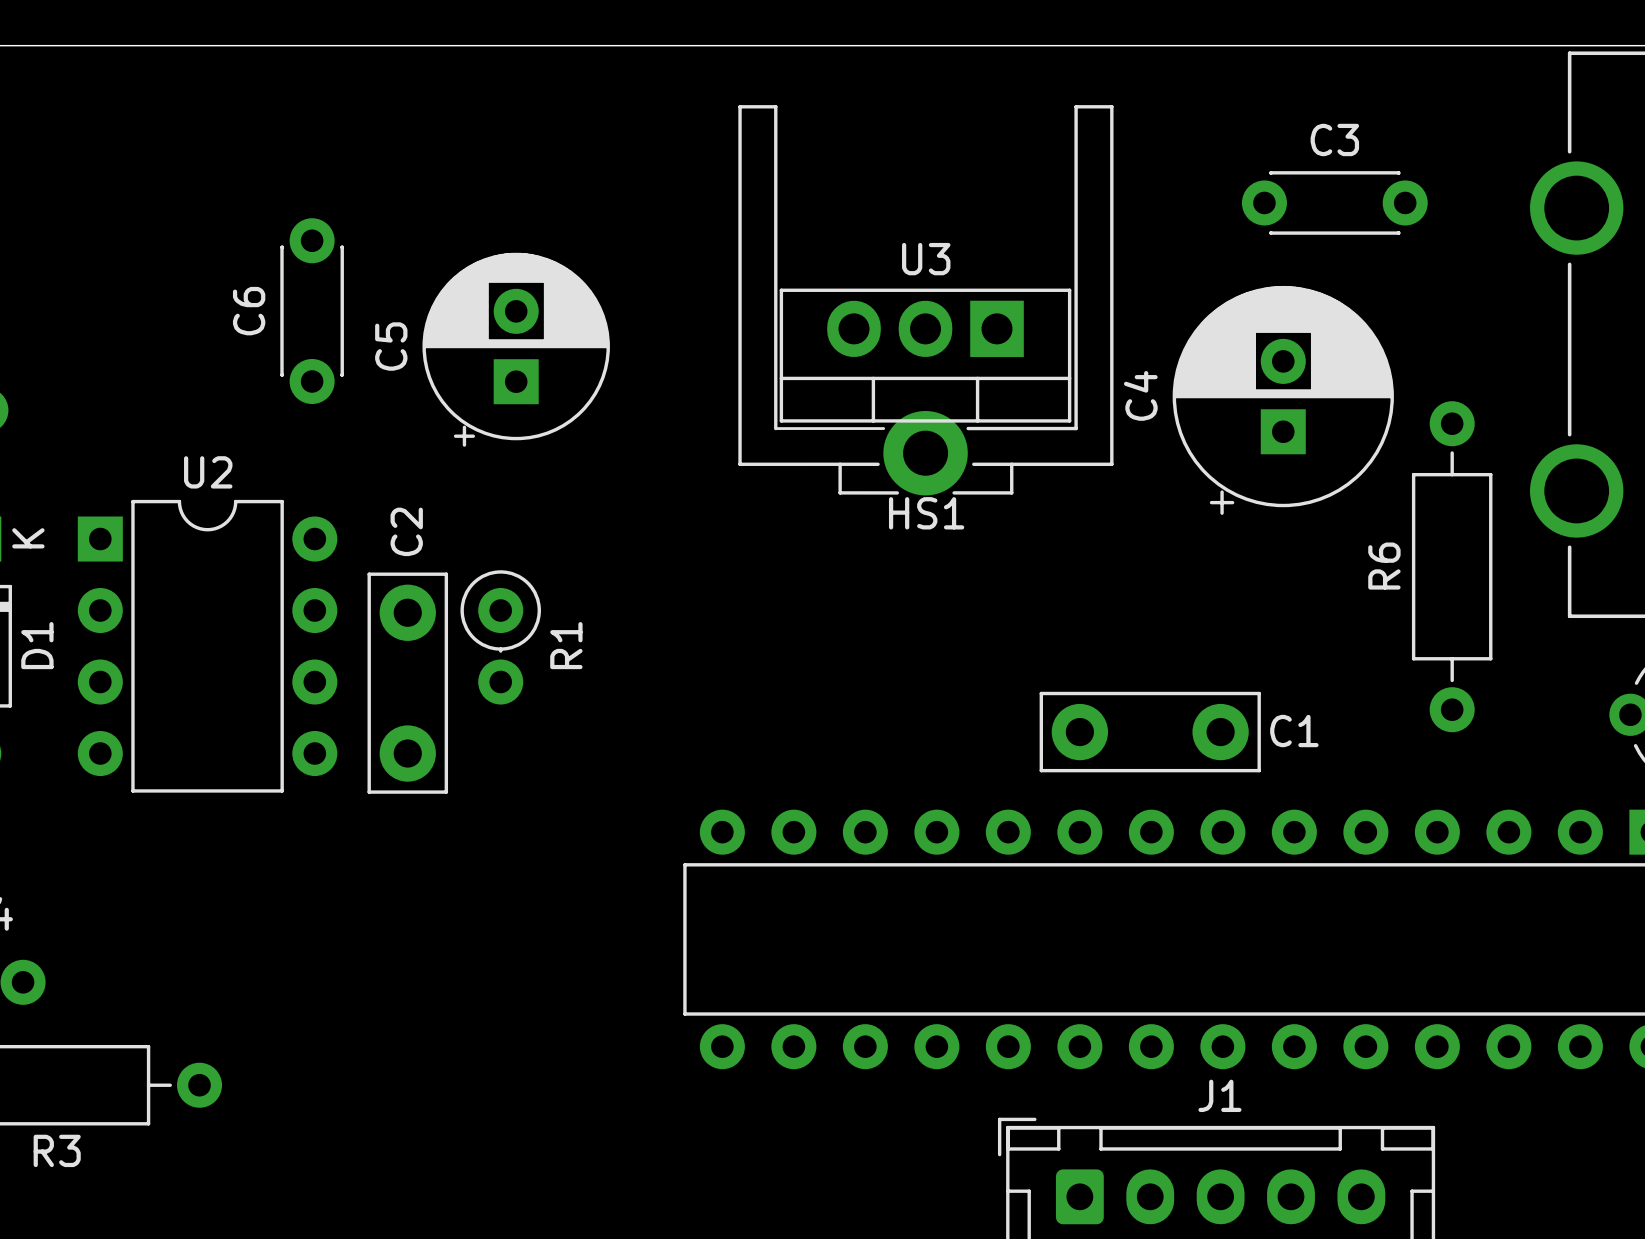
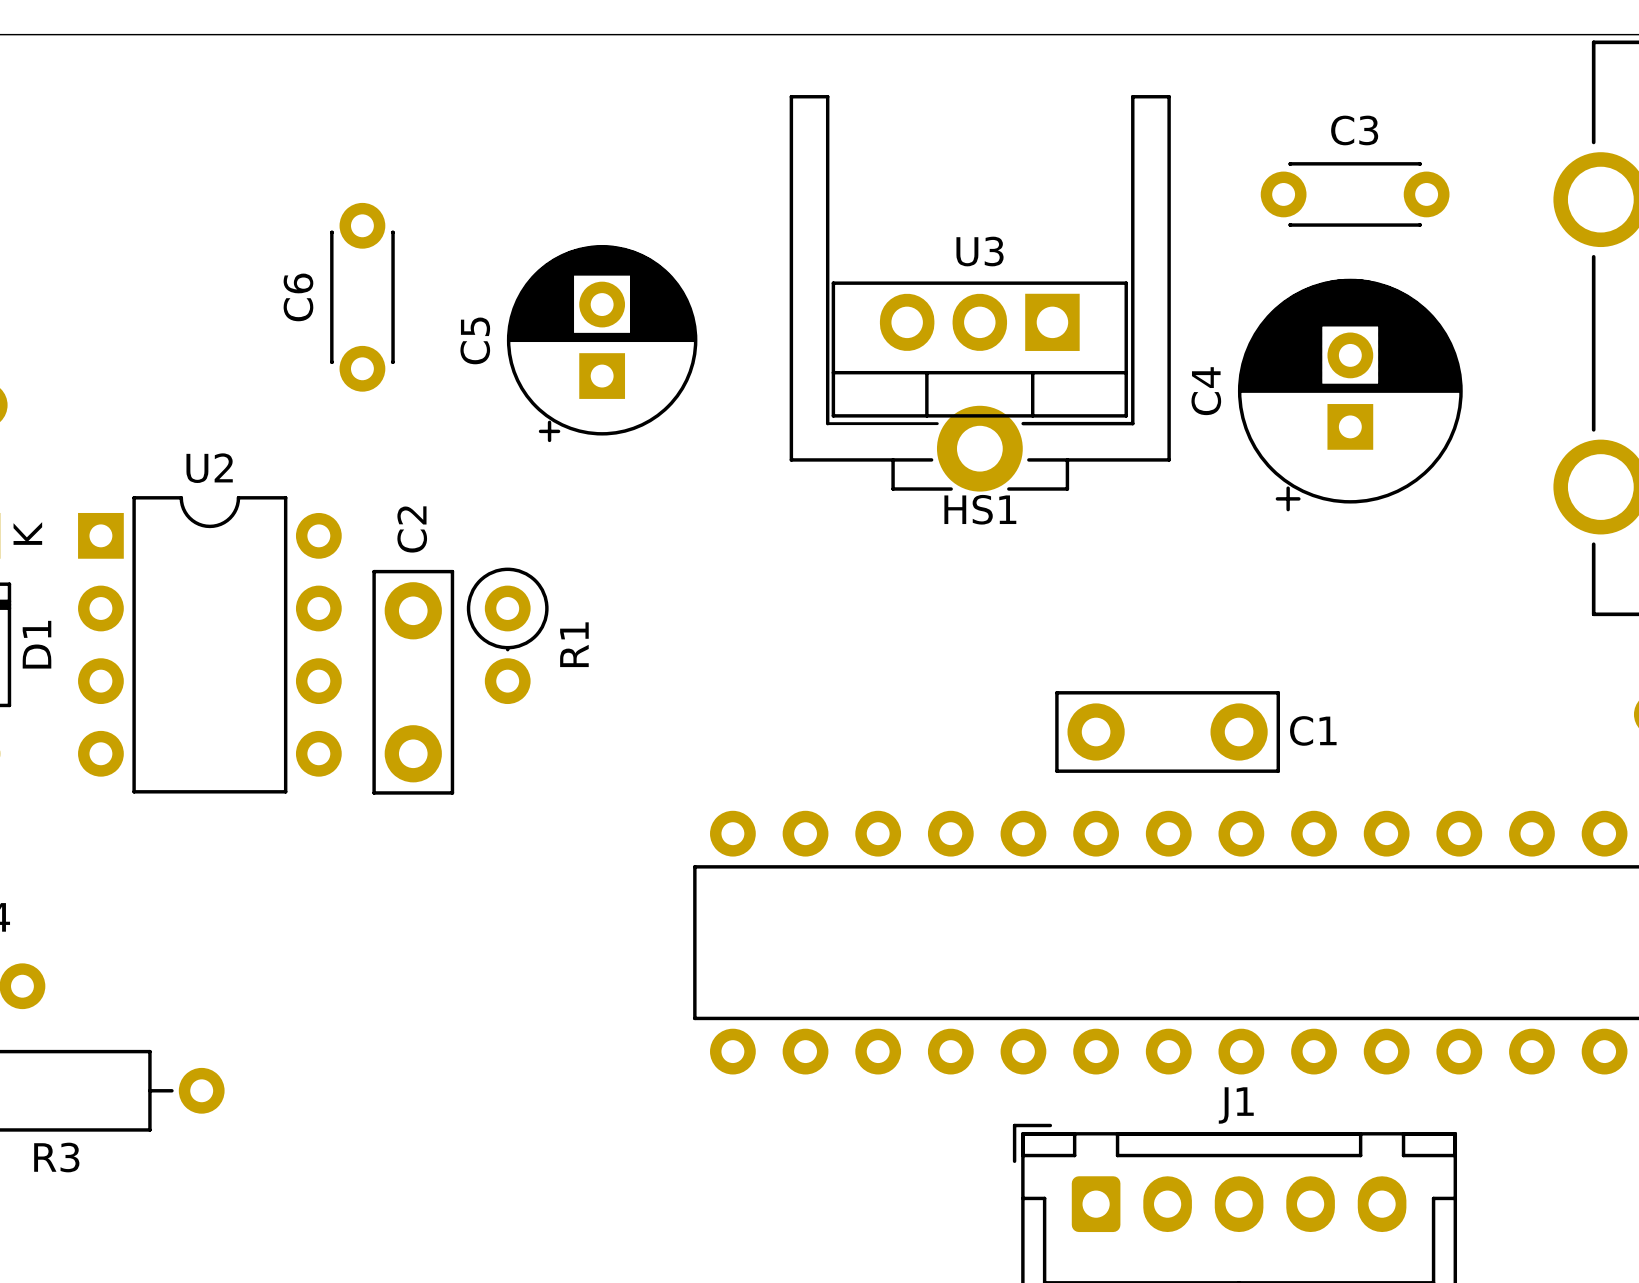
HS1 position: (925, 300) -> (980, 293)
C6 position: (312, 311) -> (362, 297)
C5 position: (516, 349) -> (602, 343)
U3 position: (925, 355) -> (979, 349)
C4 position: (1283, 400) -> (1350, 395)
R6: (1452, 566) -> none

